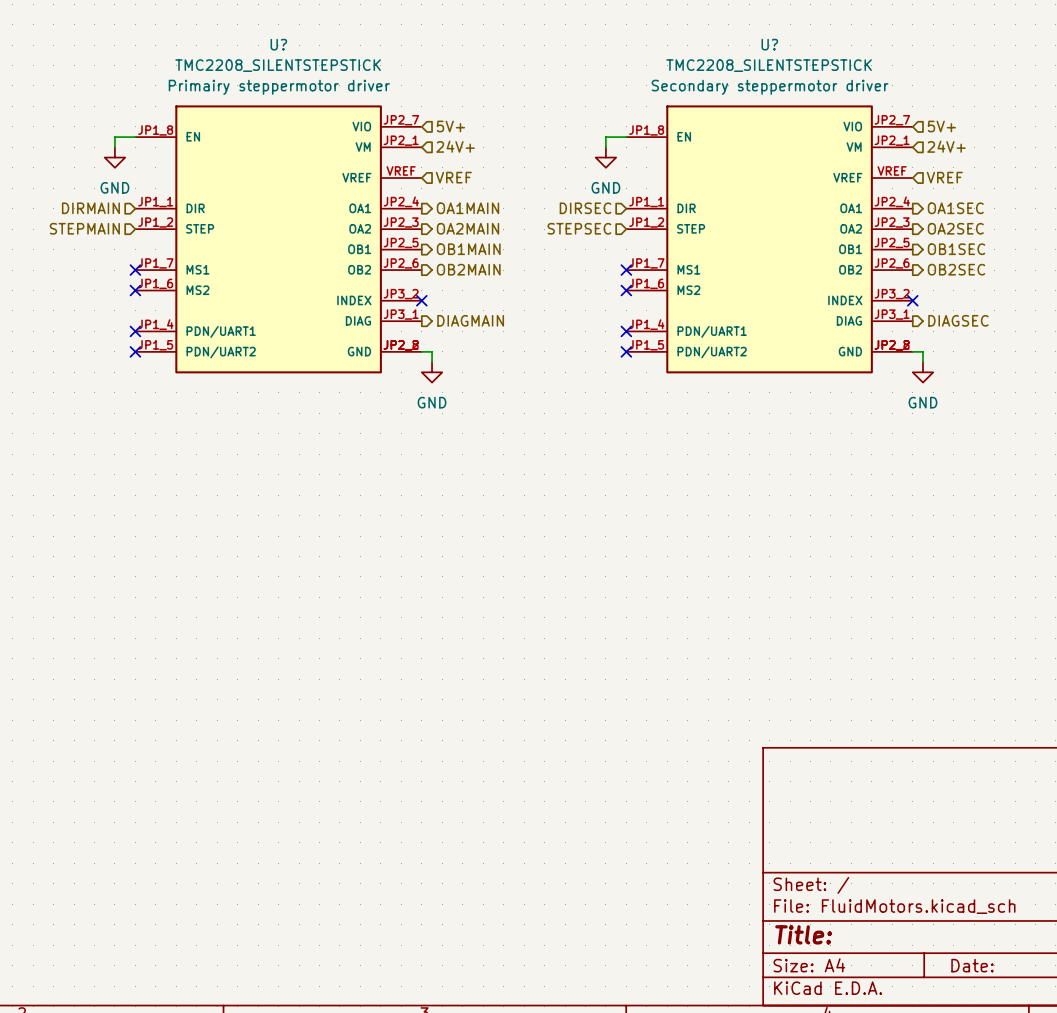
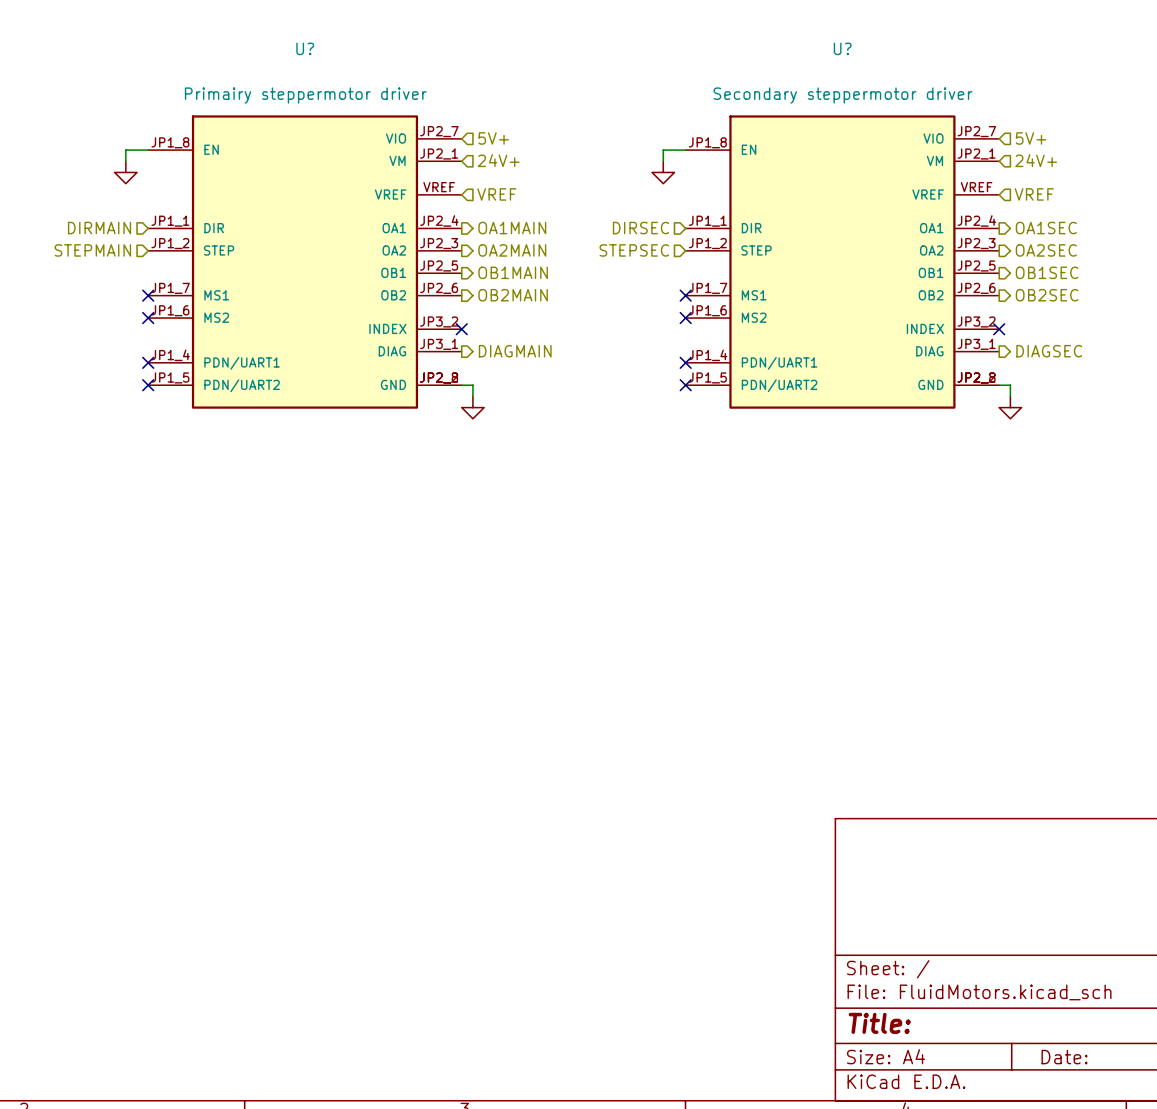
U? value: TMC2208_SILENTSTEPSTICK (278, 65) -> none
U? value: TMC2208_SILENTSTEPSTICK (769, 65) -> none
power symbol text: GND (114, 187) -> none
power symbol text: GND (605, 187) -> none
power symbol text: GND (432, 402) -> none
power symbol text: GND (922, 402) -> none

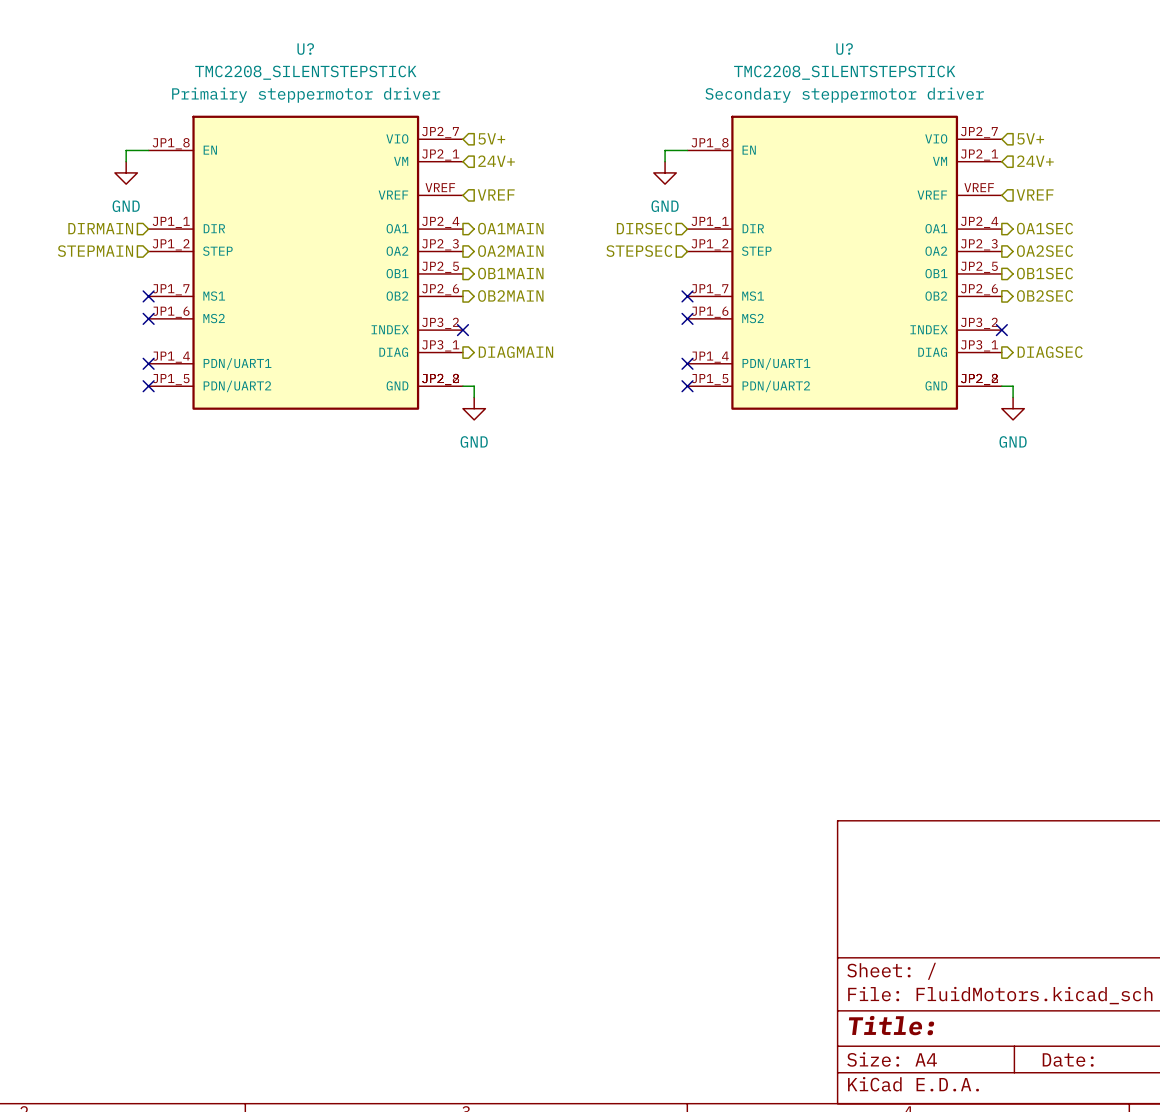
U? value: none -> TMC2208_SILENTSTEPSTICK (305, 72)
U? value: none -> TMC2208_SILENTSTEPSTICK (844, 72)
power symbol text: none -> GND (126, 206)
power symbol text: none -> GND (665, 206)
power symbol text: none -> GND (474, 441)
power symbol text: none -> GND (1013, 441)

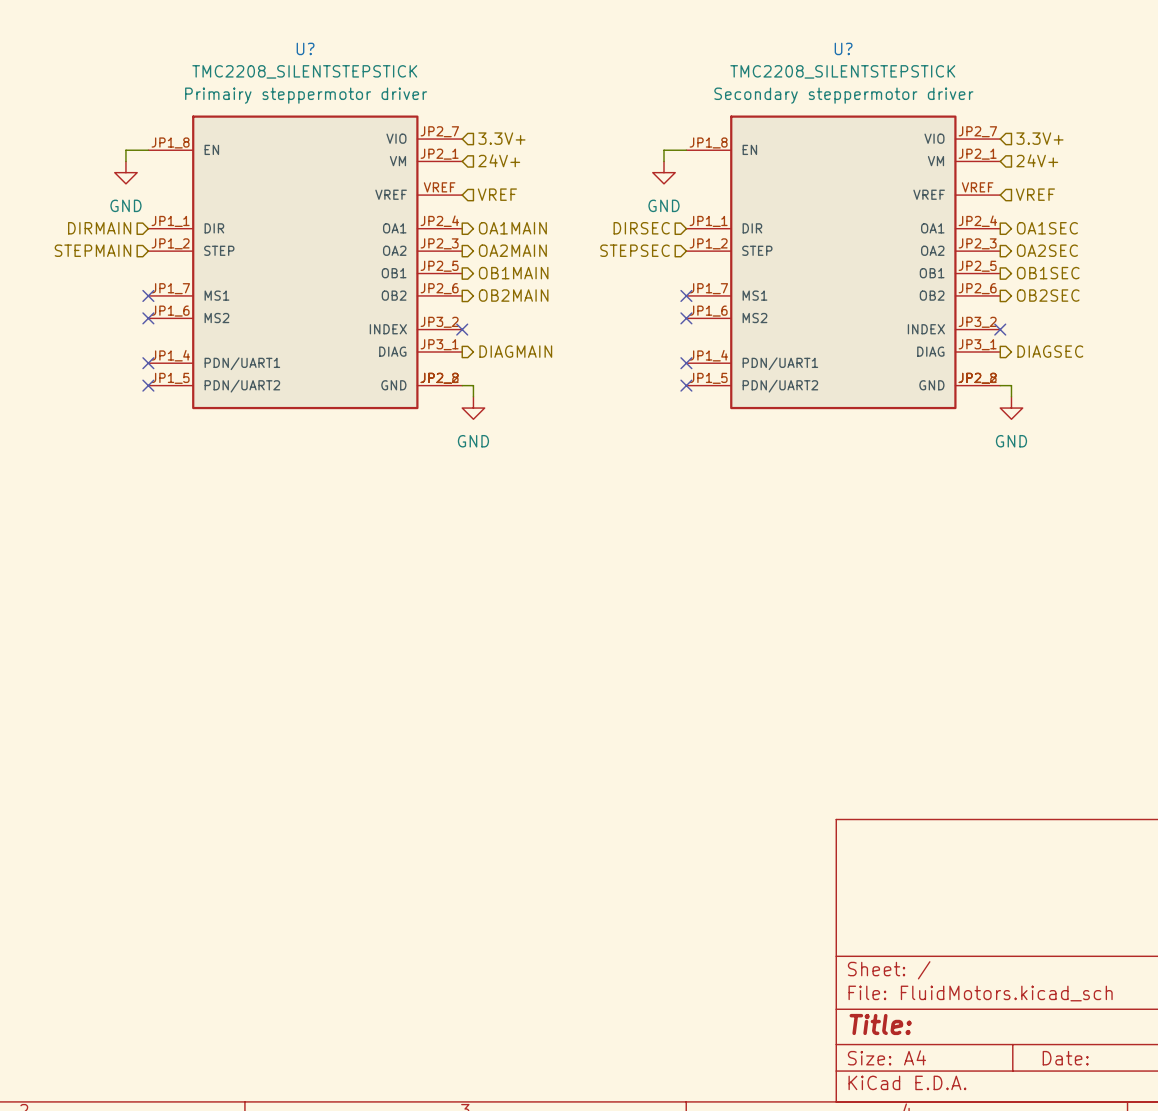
hierarchical label: 5V+ (491, 138) -> 3.3V+ (501, 138)
hierarchical label: 5V+ (1030, 138) -> 3.3V+ (1039, 138)

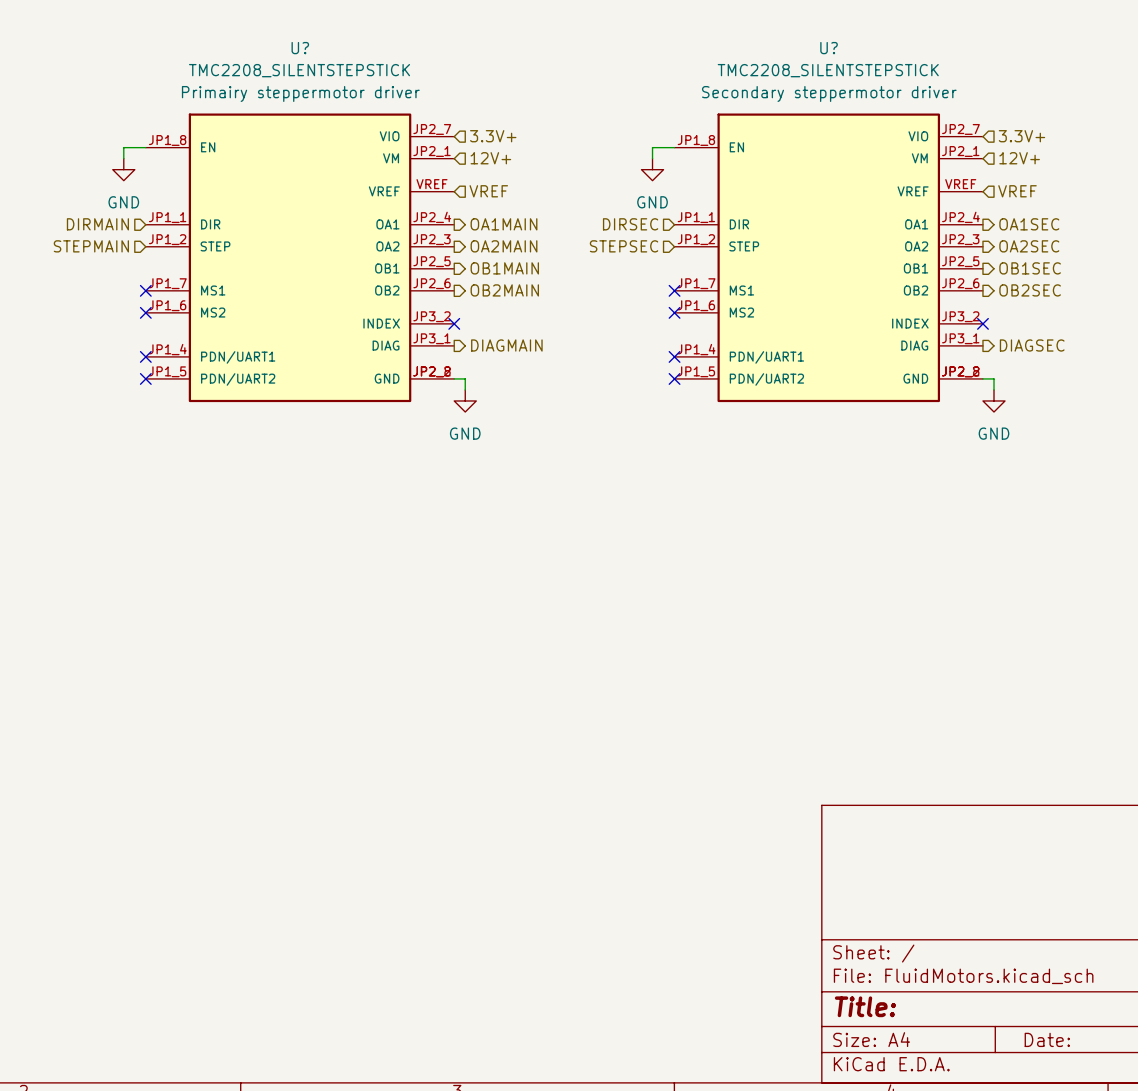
hierarchical label: 24V+ (499, 160) -> 12V+ (490, 158)
hierarchical label: 24V+ (1037, 160) -> 12V+ (1019, 158)

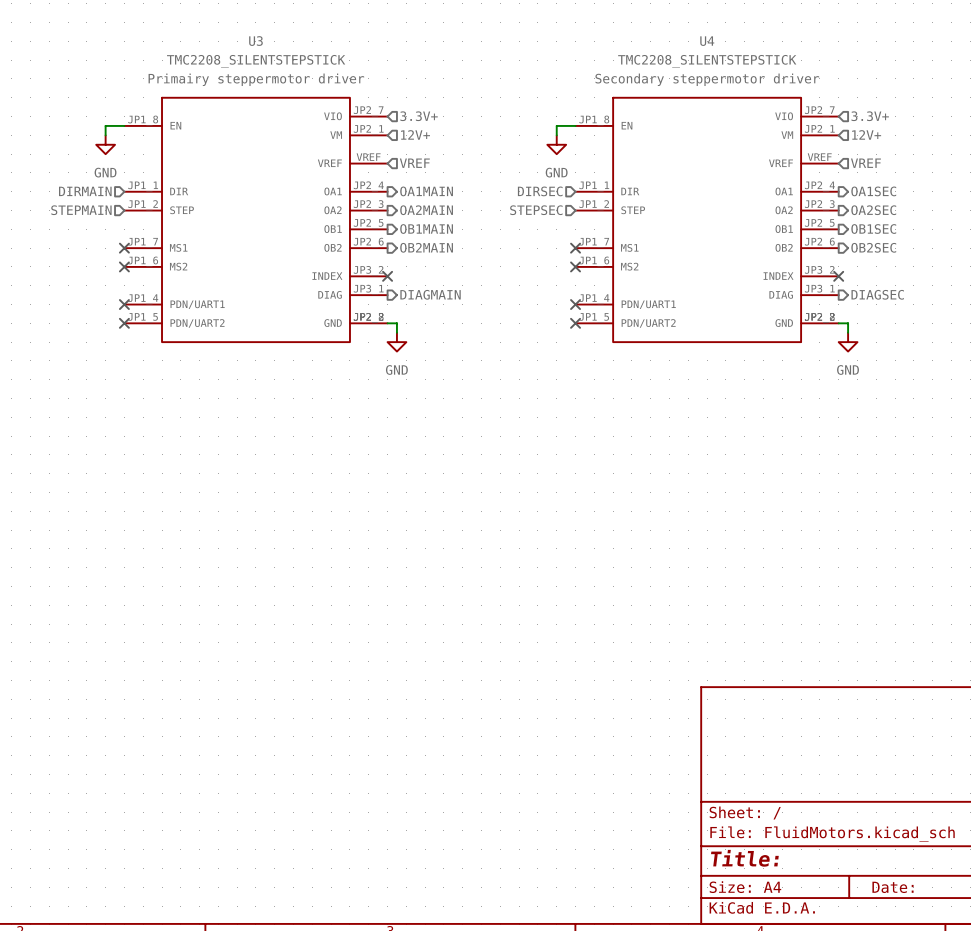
U? name: U? (300, 48) -> U3 (255, 41)
U? name: U? (829, 48) -> U4 (707, 41)

